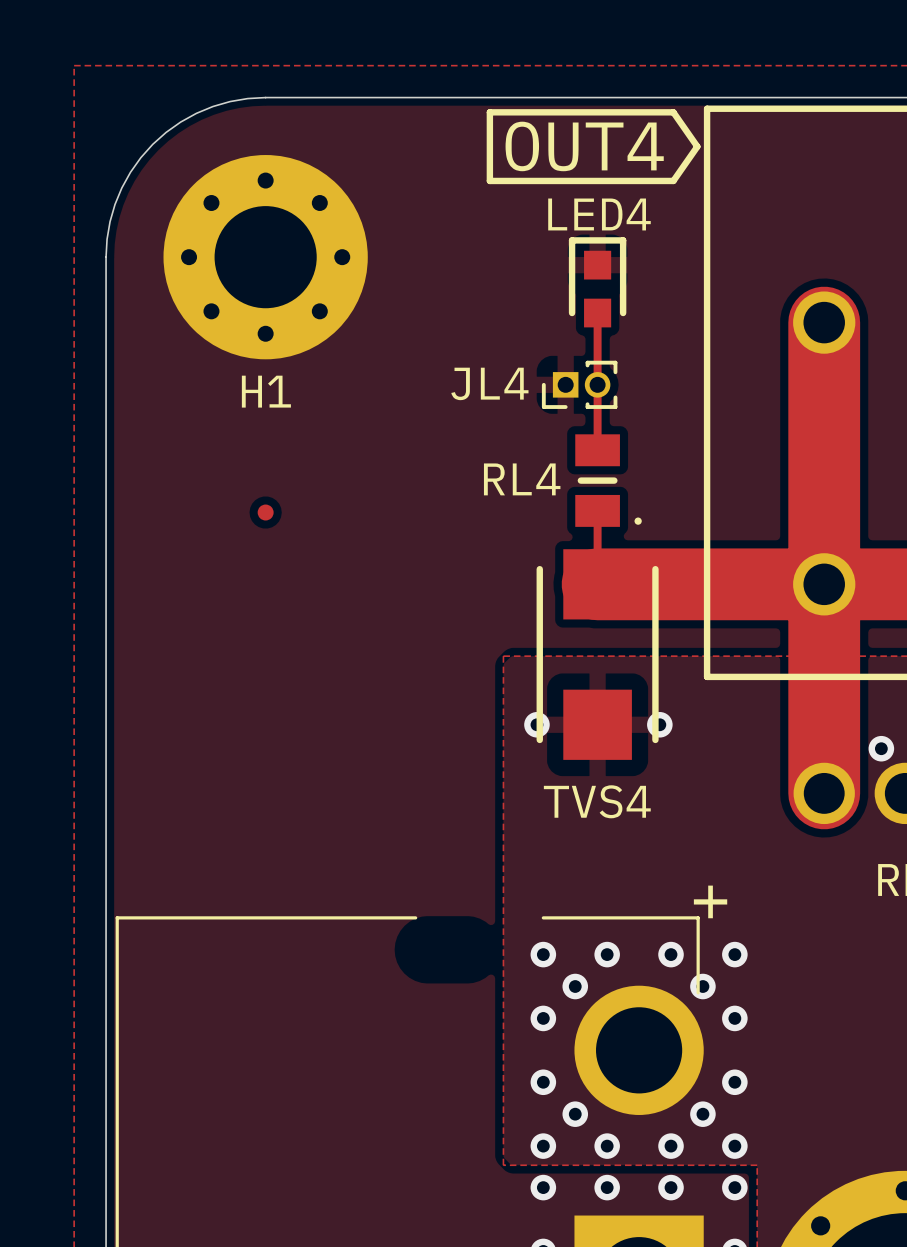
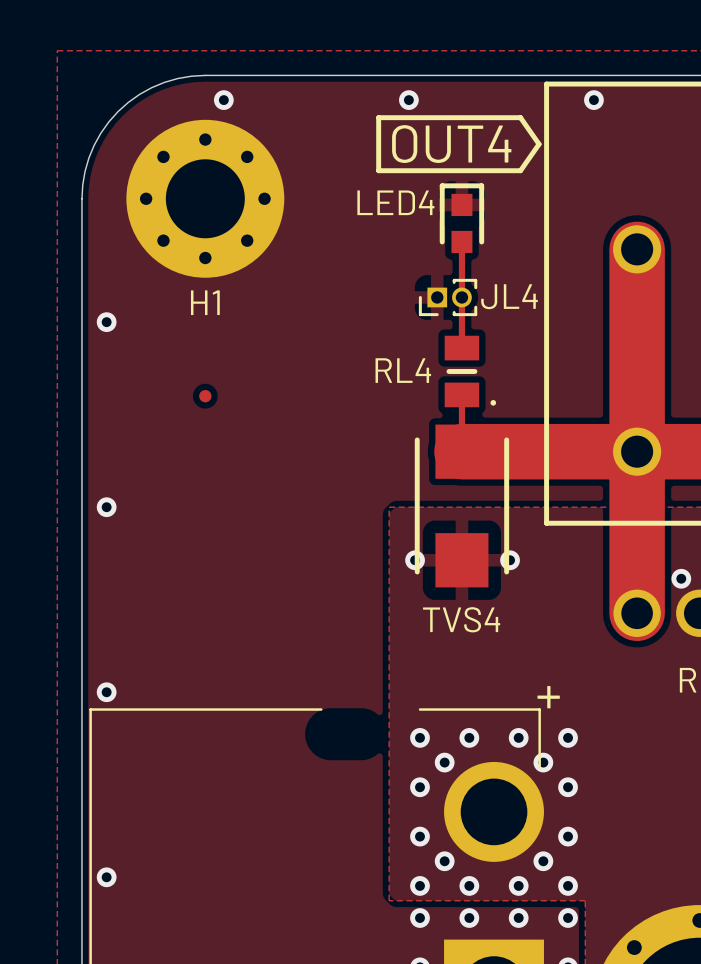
via: none -> (223, 100)
via: none -> (408, 100)
via: none -> (593, 100)
text position: OUT4 (584, 146) -> OUT4 (451, 144)
line: (489, 152) (489, 112) (673, 112) (697, 146) (673, 180) (489, 180) -> (378, 117) (520, 117) (539, 144) (520, 170) (378, 170) (378, 139)
LED4 name position: LED4 (599, 214) -> LED4 (395, 202)
JL4 name position: JL4 (489, 383) -> JL4 (509, 296)
via: none -> (106, 322)
via: none -> (106, 507)
via: none -> (106, 692)
via: none -> (106, 877)

